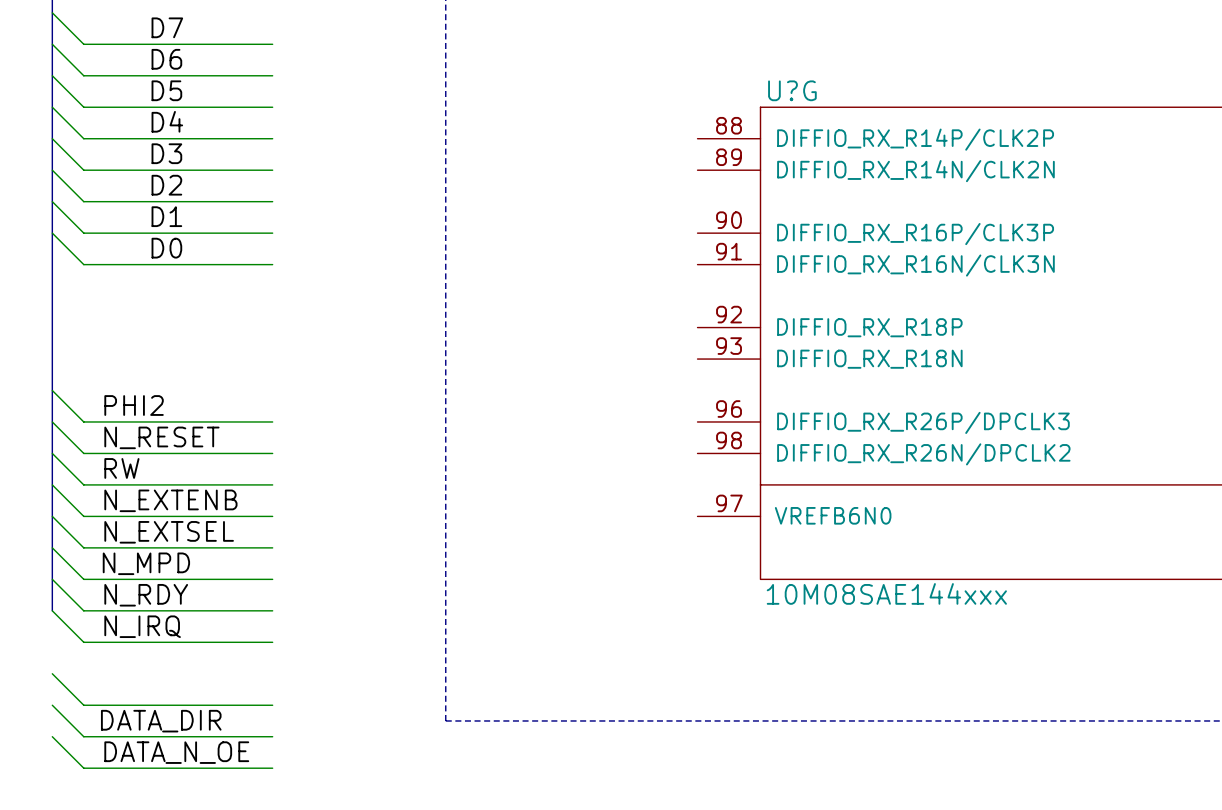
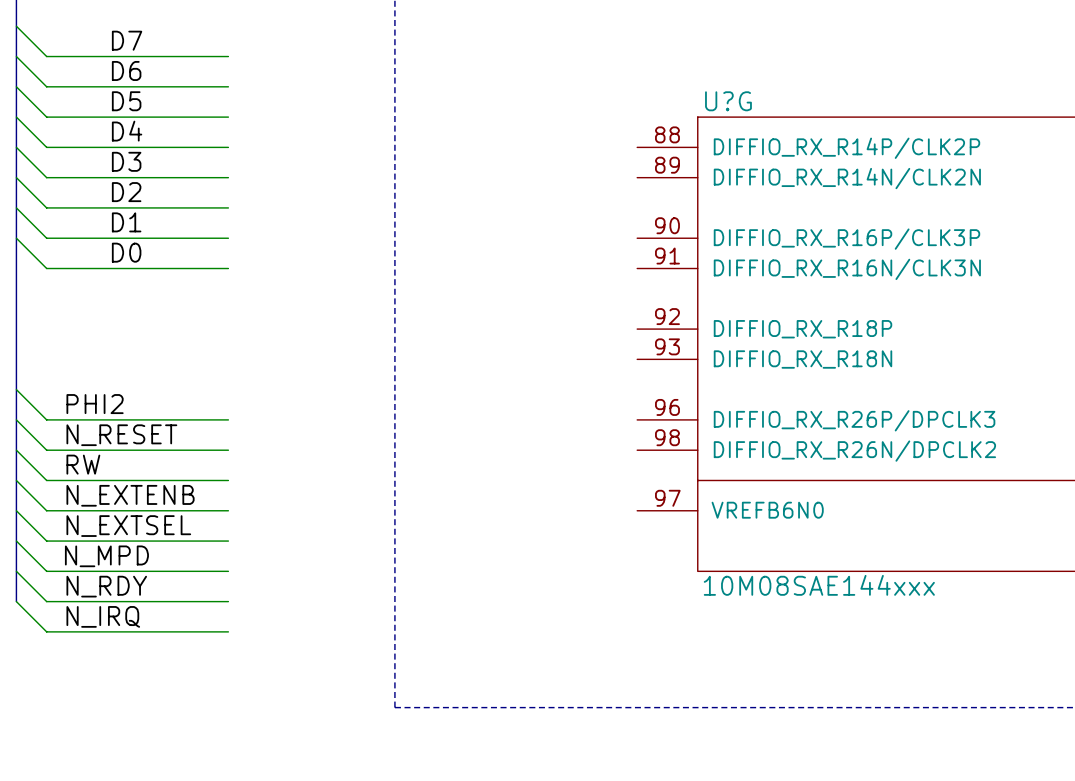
wire: (52, 673) (83, 705) (272, 705) -> none
wire: (52, 705) (83, 736) (272, 736) -> none
label: DATA_DIR (161, 721) -> none
wire: (52, 736) (83, 768) (272, 768) -> none
label: DATA_N_OE (176, 752) -> none

